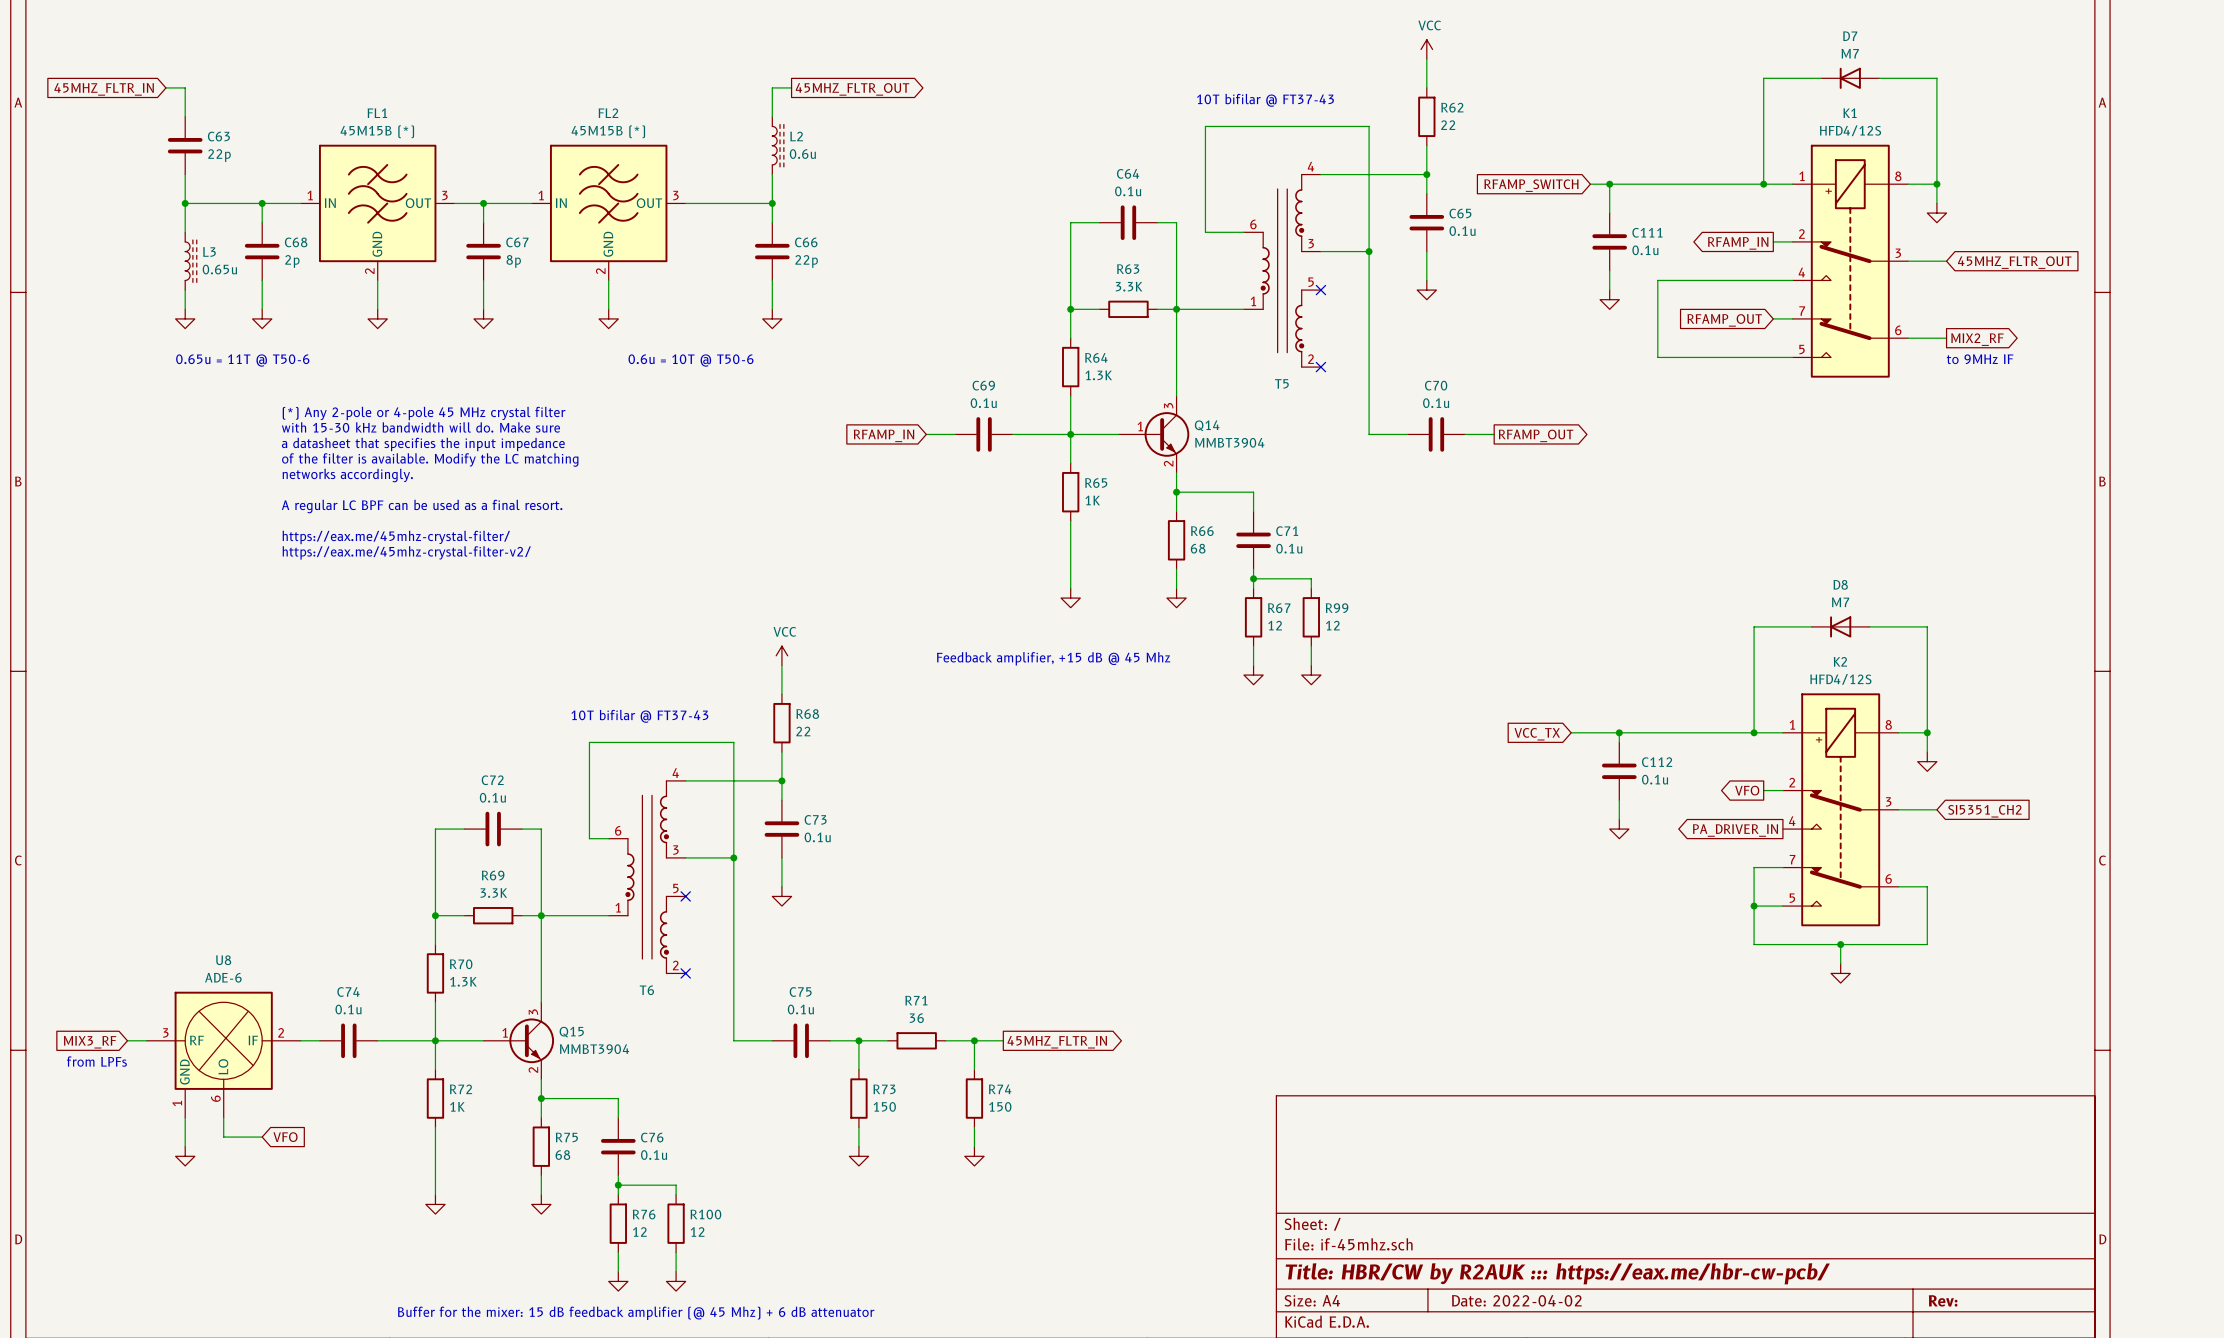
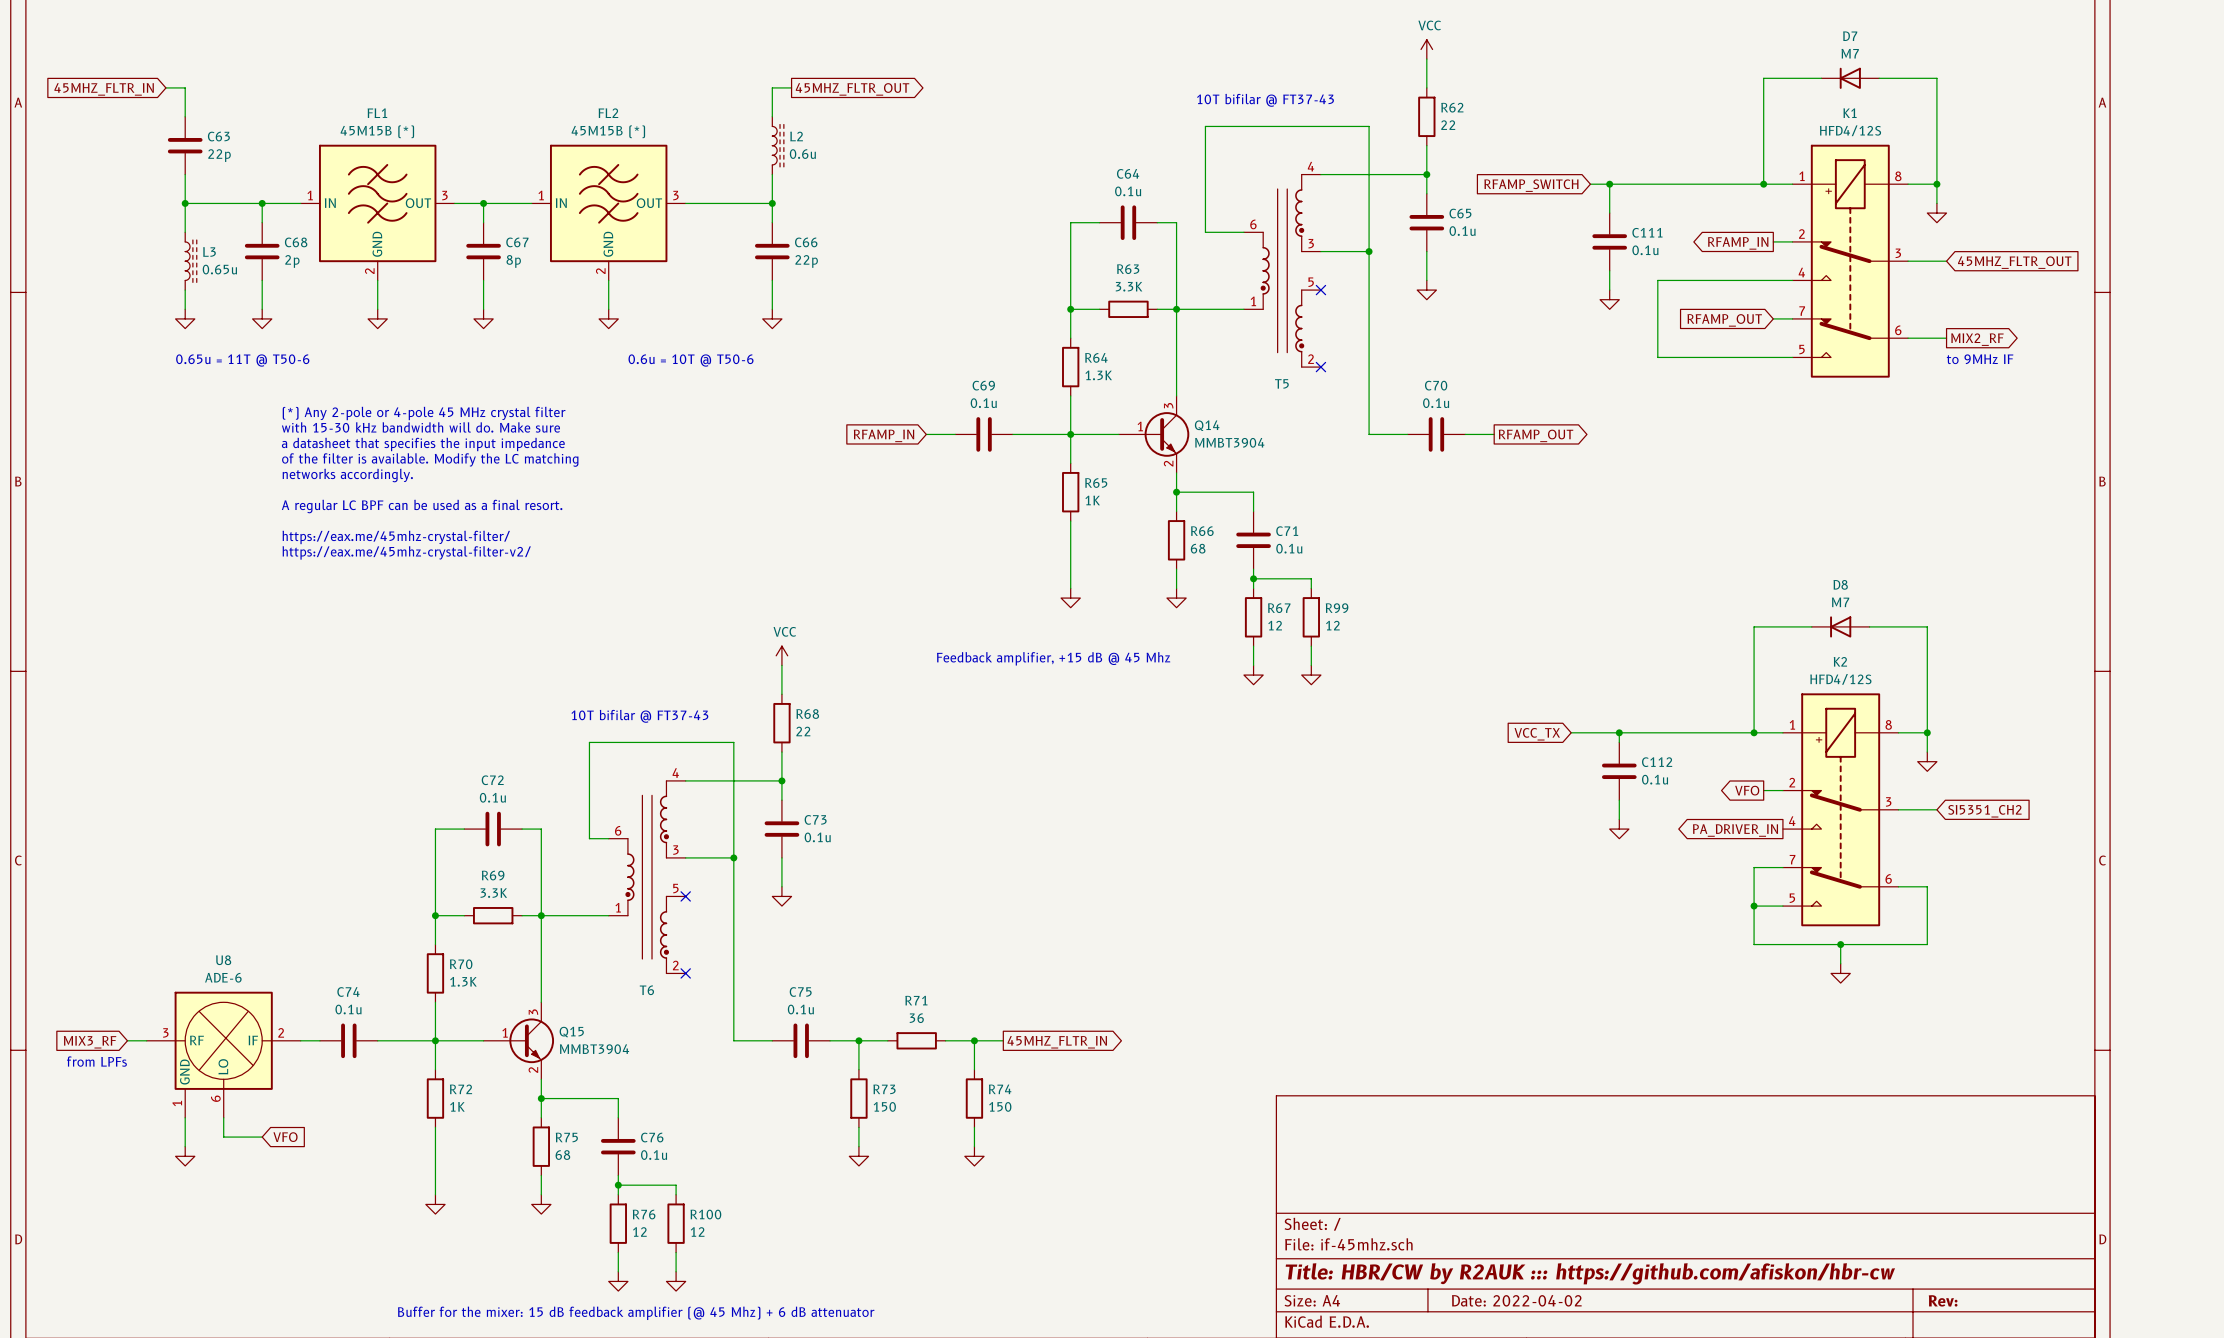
title block: Title: HBR/CW by R2AUK ::: https://eax.me/hbr-cw-pcb/ (1557, 1273) -> Title: HBR/CW by R2AUK ::: https://github.com/afiskon/hbr-cw (1590, 1273)

